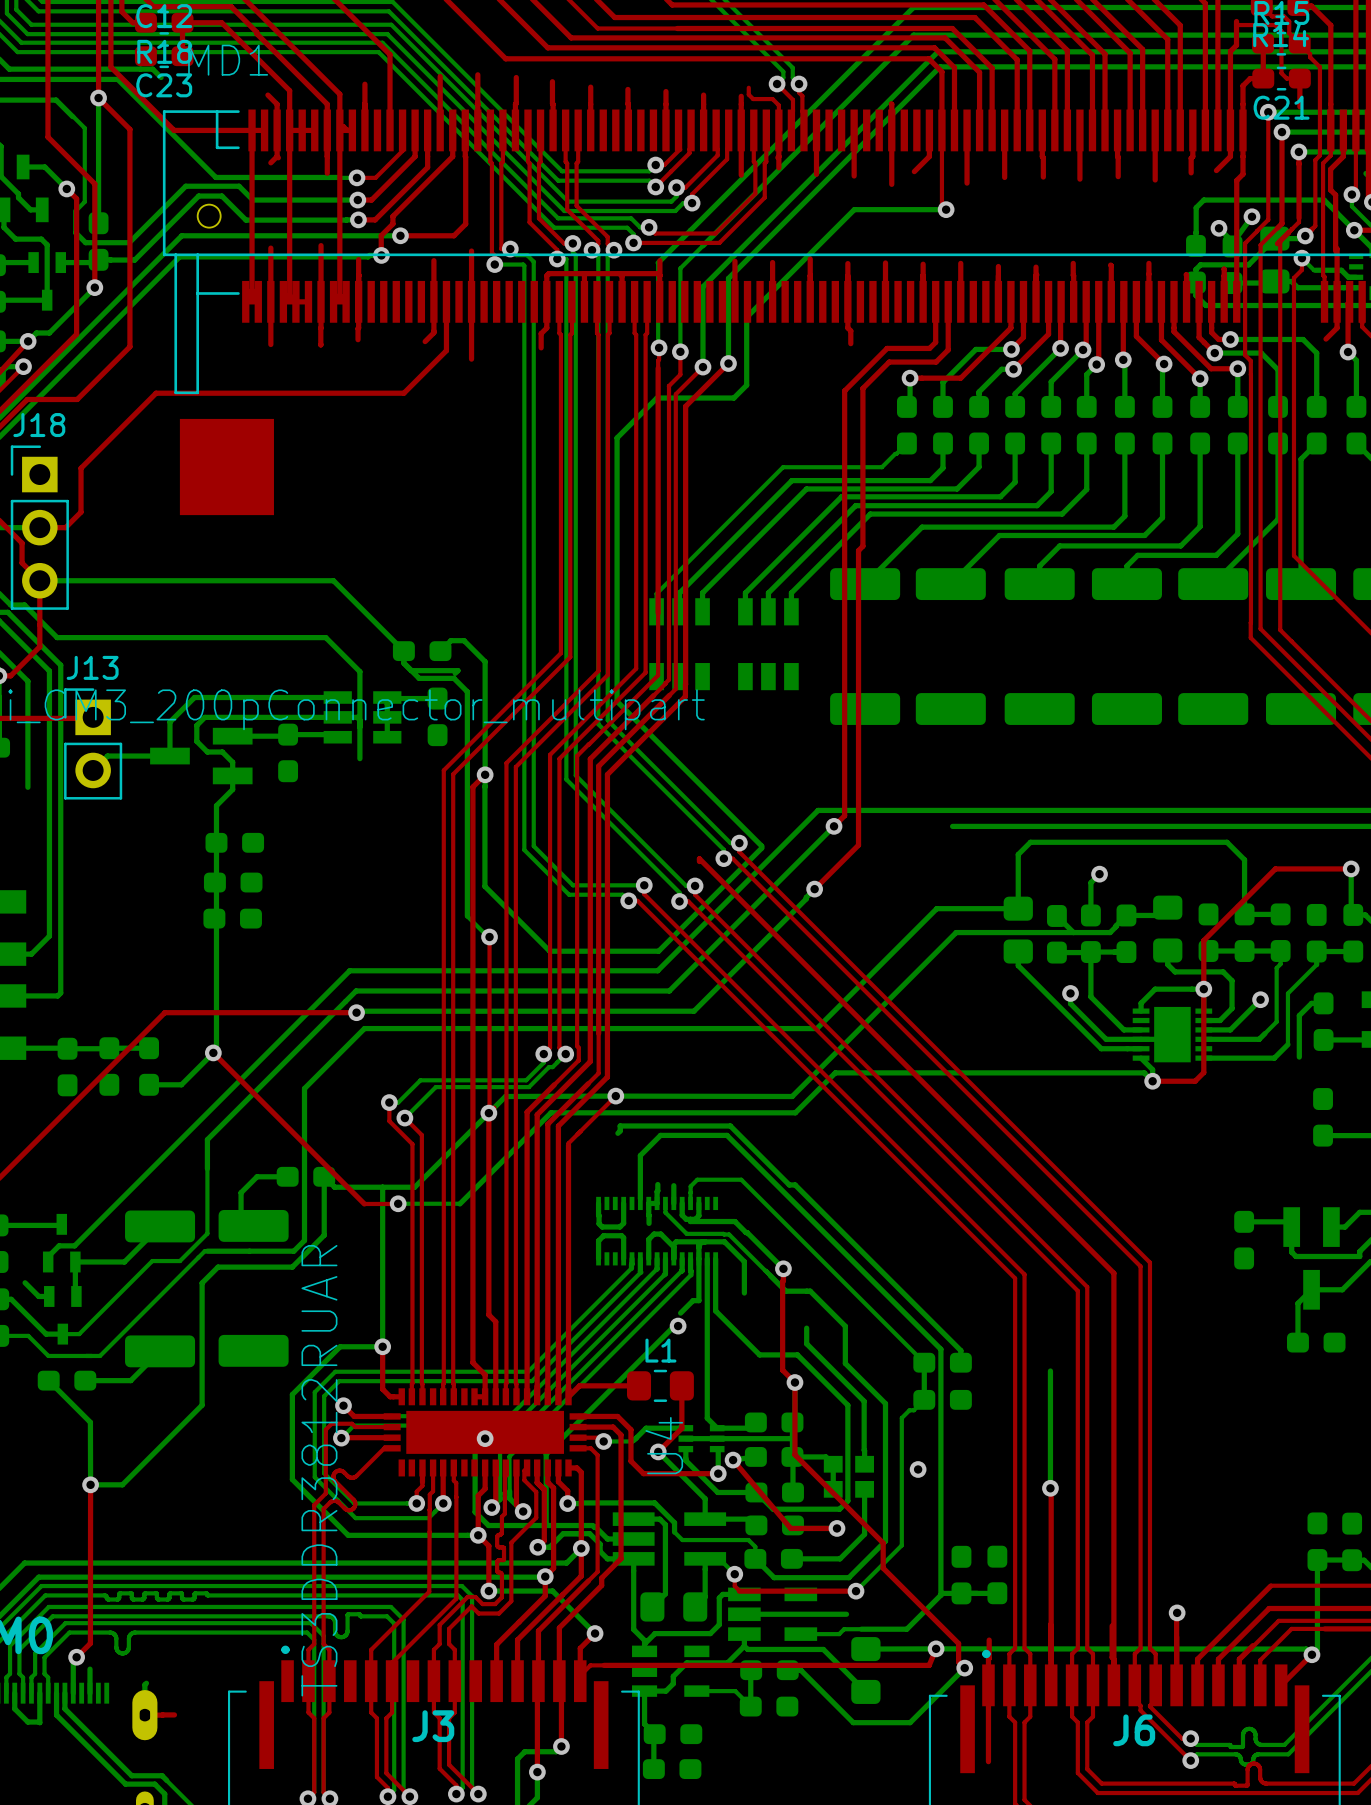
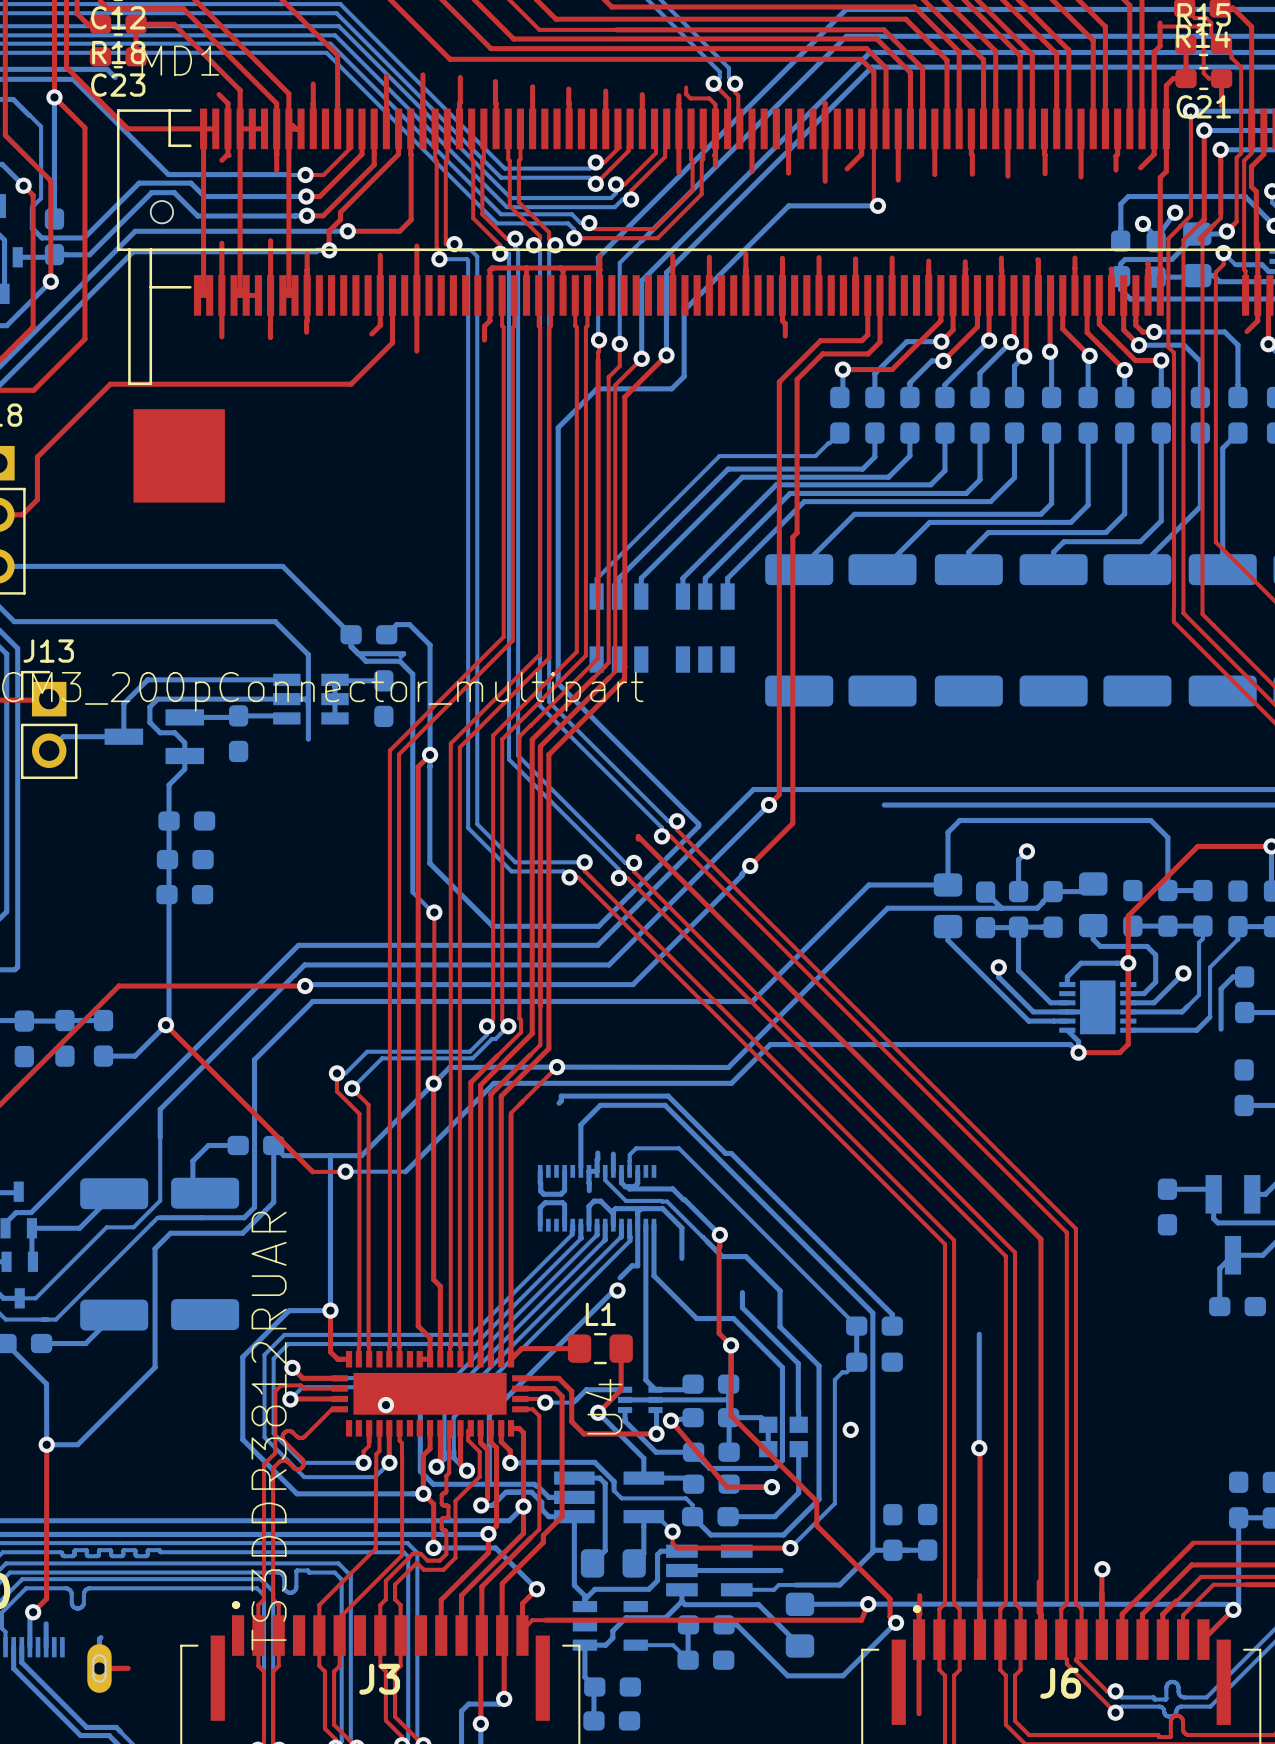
via position: (485, 1438) -> (385, 1405)

